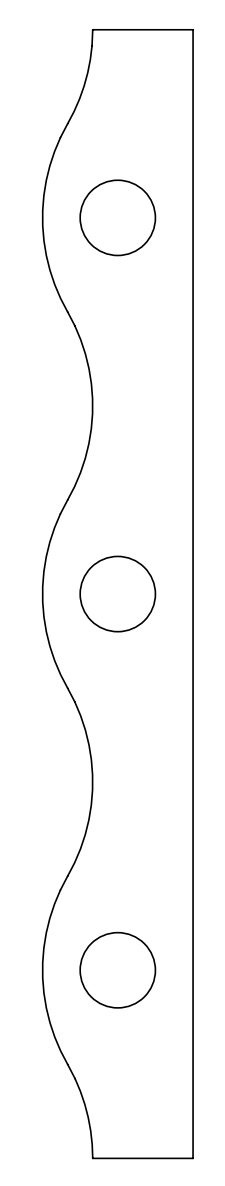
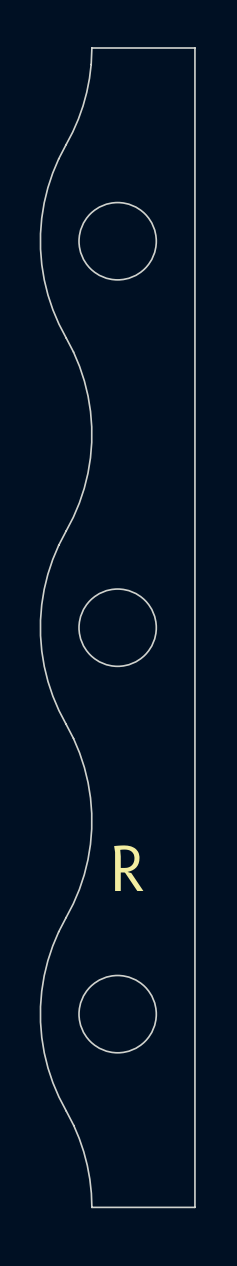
text: none -> R (128, 868)

